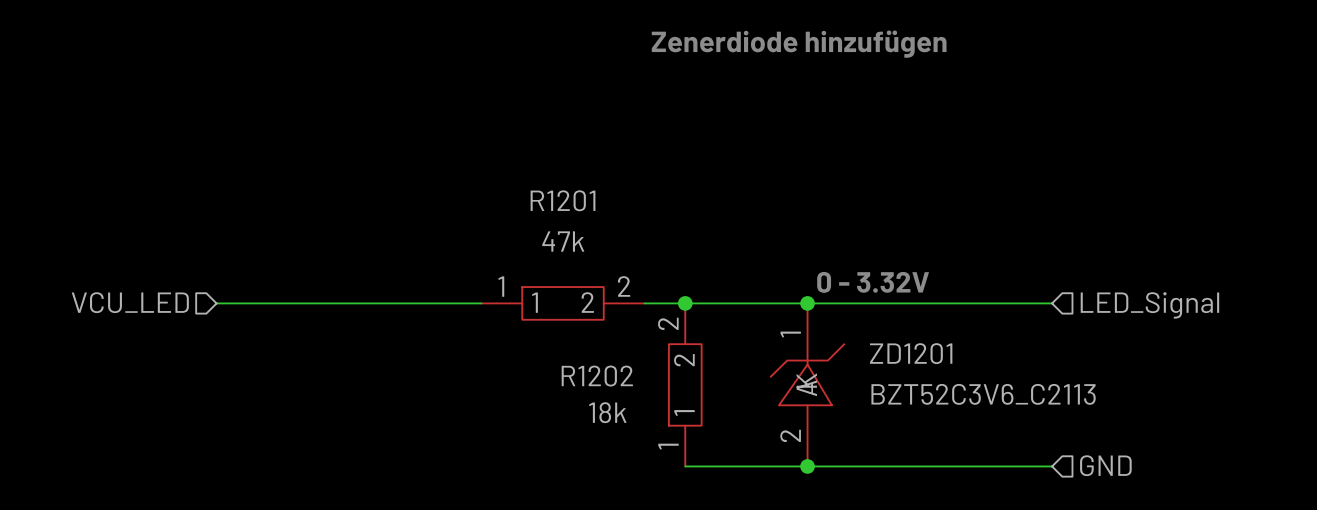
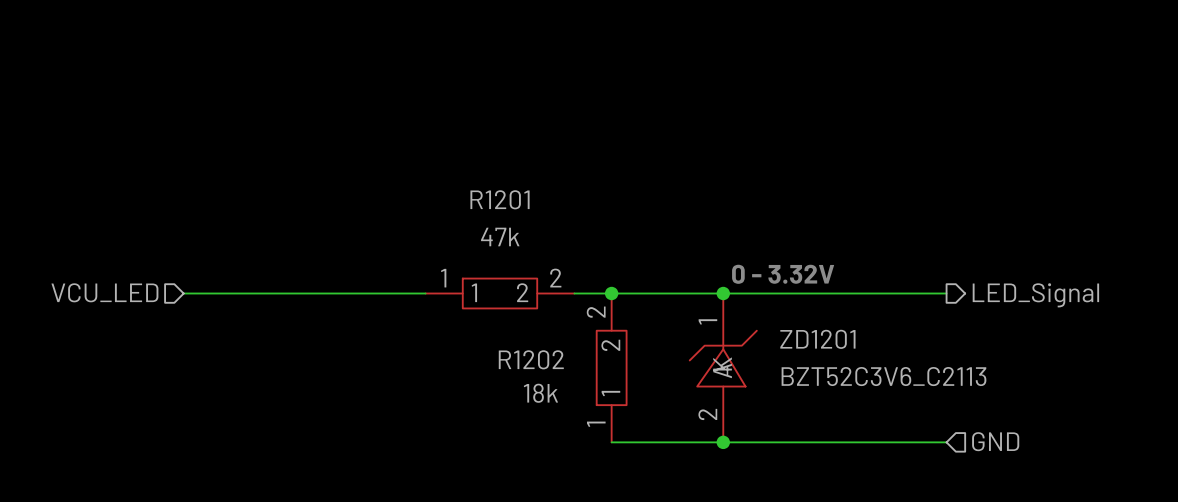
text: Zenerdiode hinzufügen (799, 44) -> none
hierarchical label shape: input (1149, 305) -> output (1035, 295)

